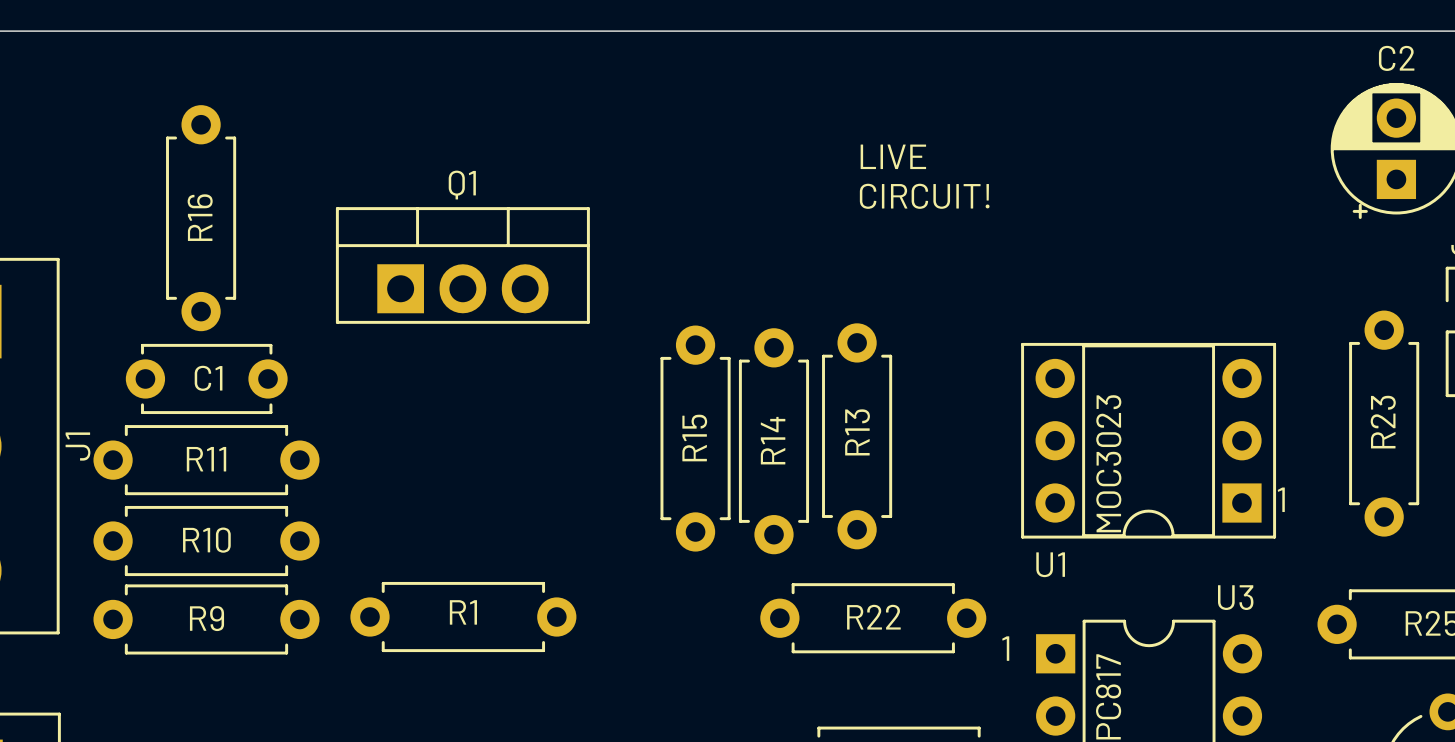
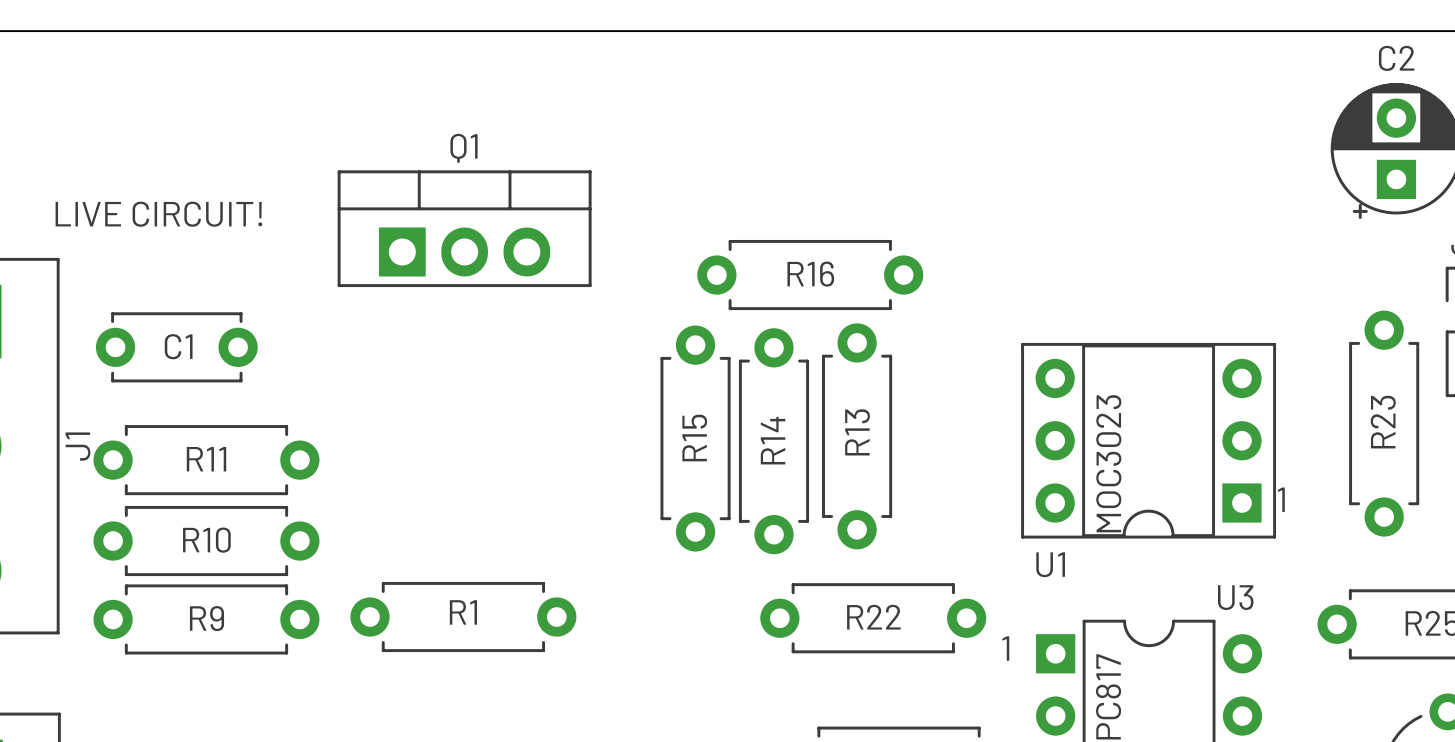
text: LIVE (893, 156) -> none
text: CIRCUIT! (924, 196) -> none
text: none -> LIVE CIRCUIT! (158, 214)
R16 rotation: 0° (201, 218) -> 90° clockwise (810, 275)
R16 position: (201, 218) -> (810, 275)
Q1 position: (462, 265) -> (464, 228)
C1 position: (206, 378) -> (176, 347)

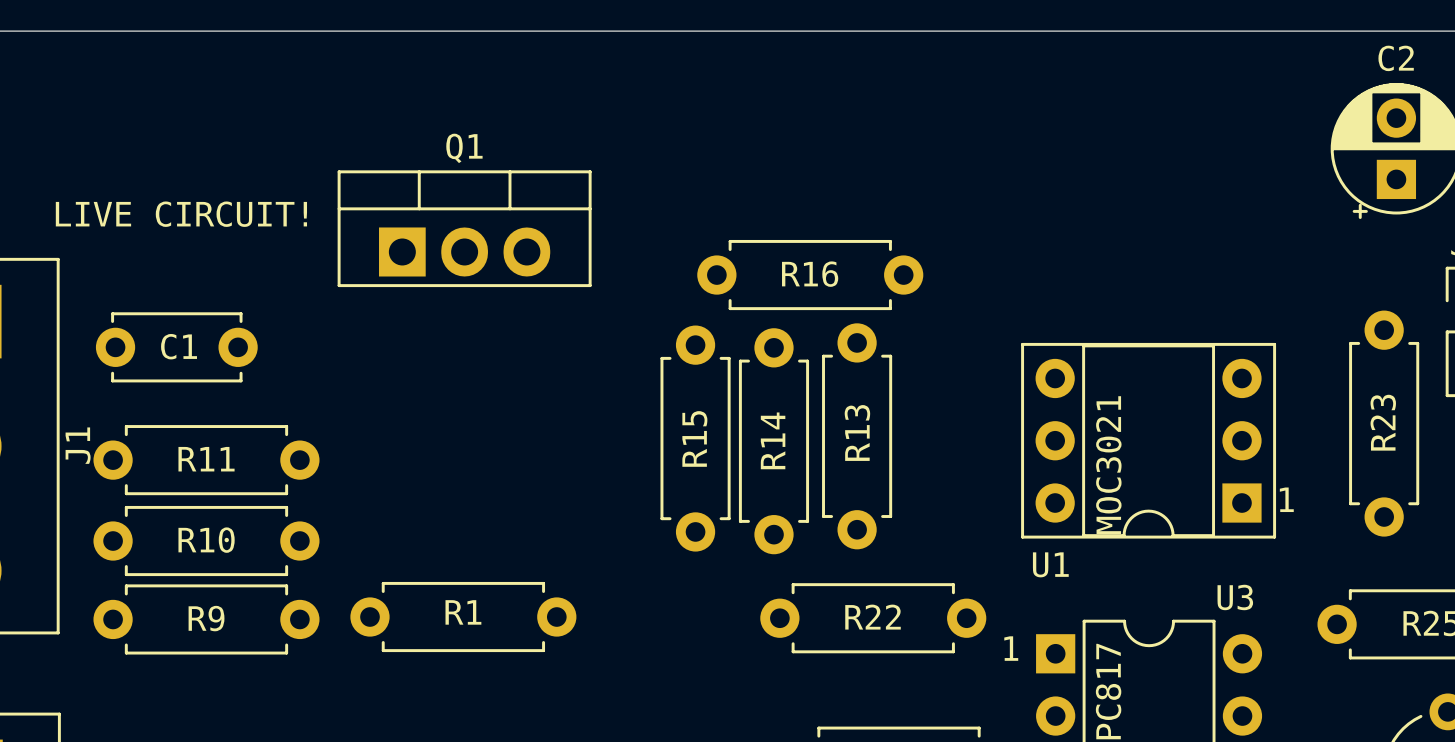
text: MOC3023 (1108, 463) -> MOC3021 (1108, 465)

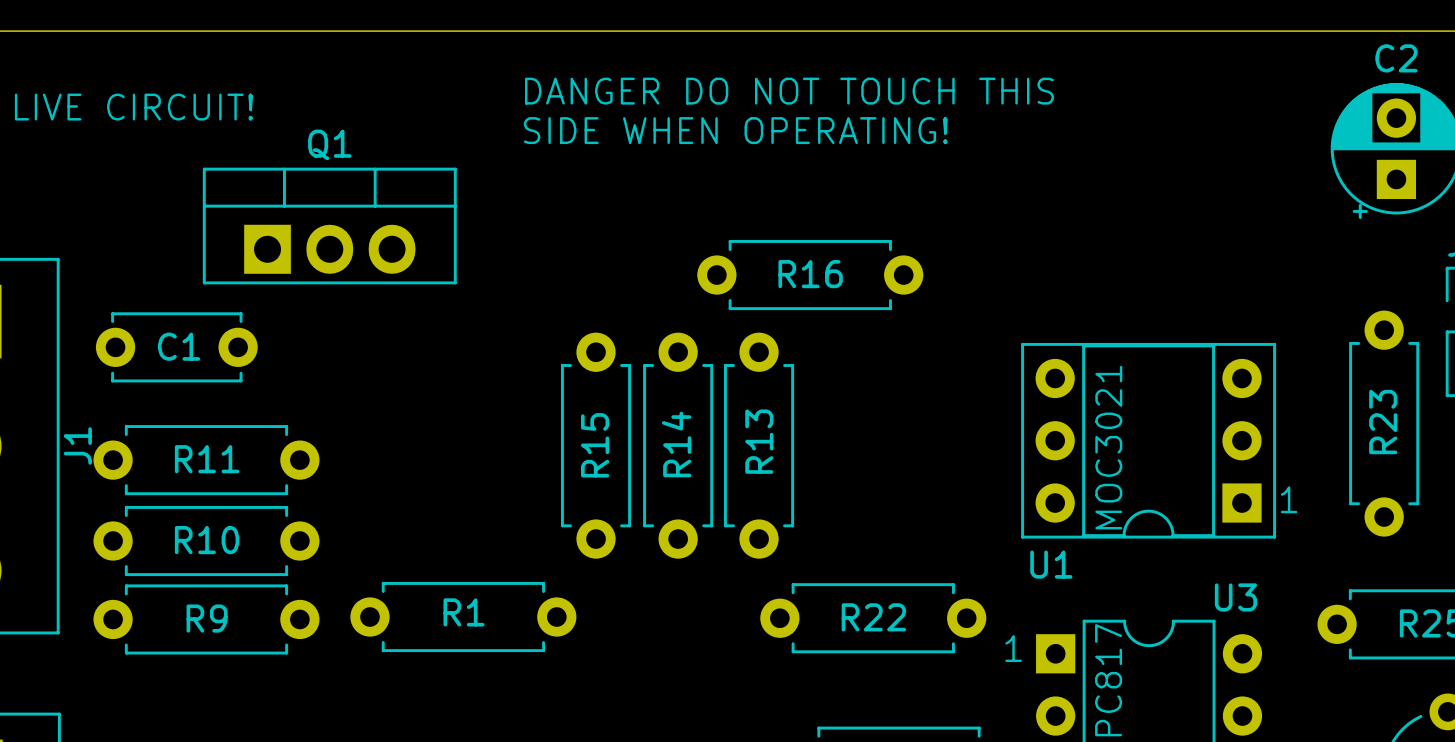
text: none -> DANGER DO NOT TOUCH THIS (789, 91)
text: none -> SIDE WHEN OPERATING! (735, 130)
text position: LIVE CIRCUIT! (181, 214) -> LIVE CIRCUIT! (134, 107)
Q1 position: (464, 228) -> (329, 226)
R13 position: (857, 436) -> (759, 445)
R15 position: (695, 438) -> (596, 445)
R14 position: (773, 441) -> (678, 445)

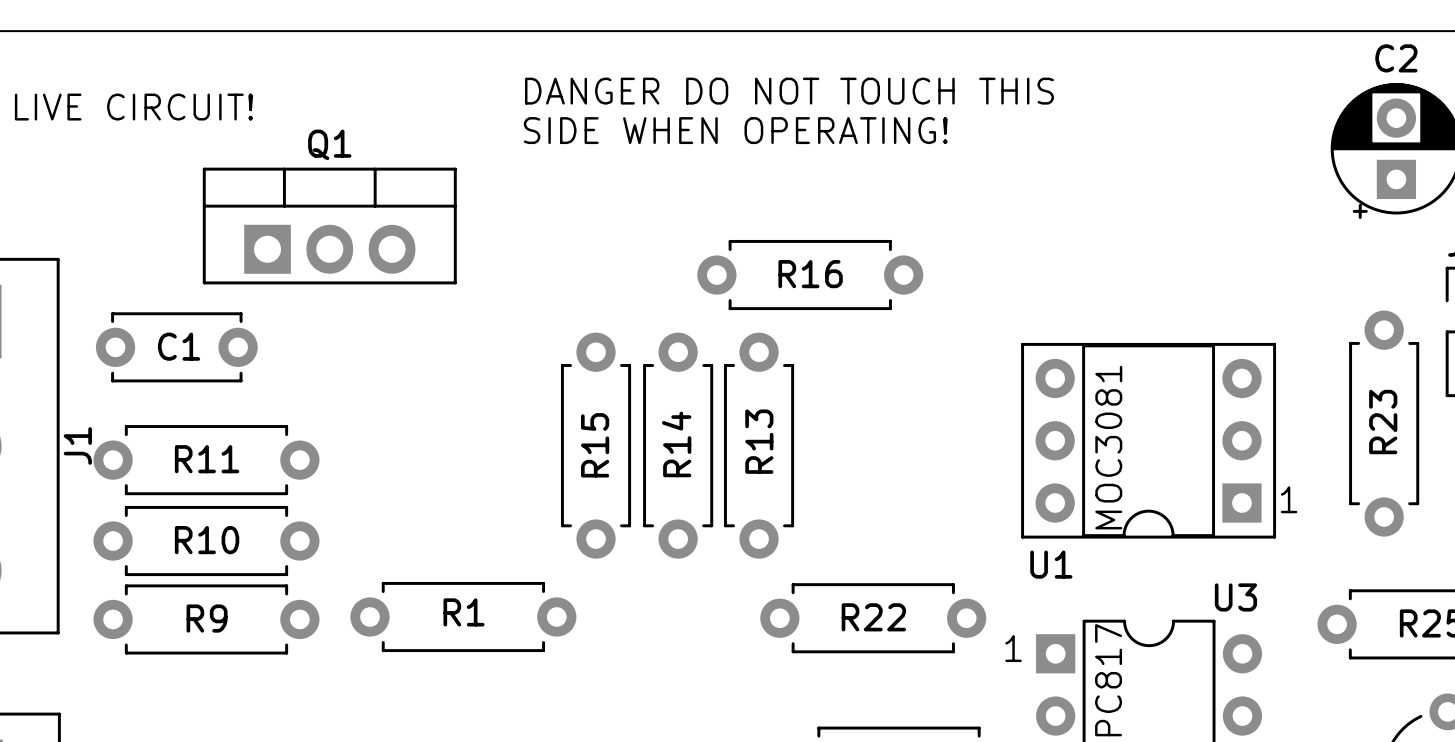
text: MOC3021 (1108, 447) -> MOC3081 (1108, 447)

